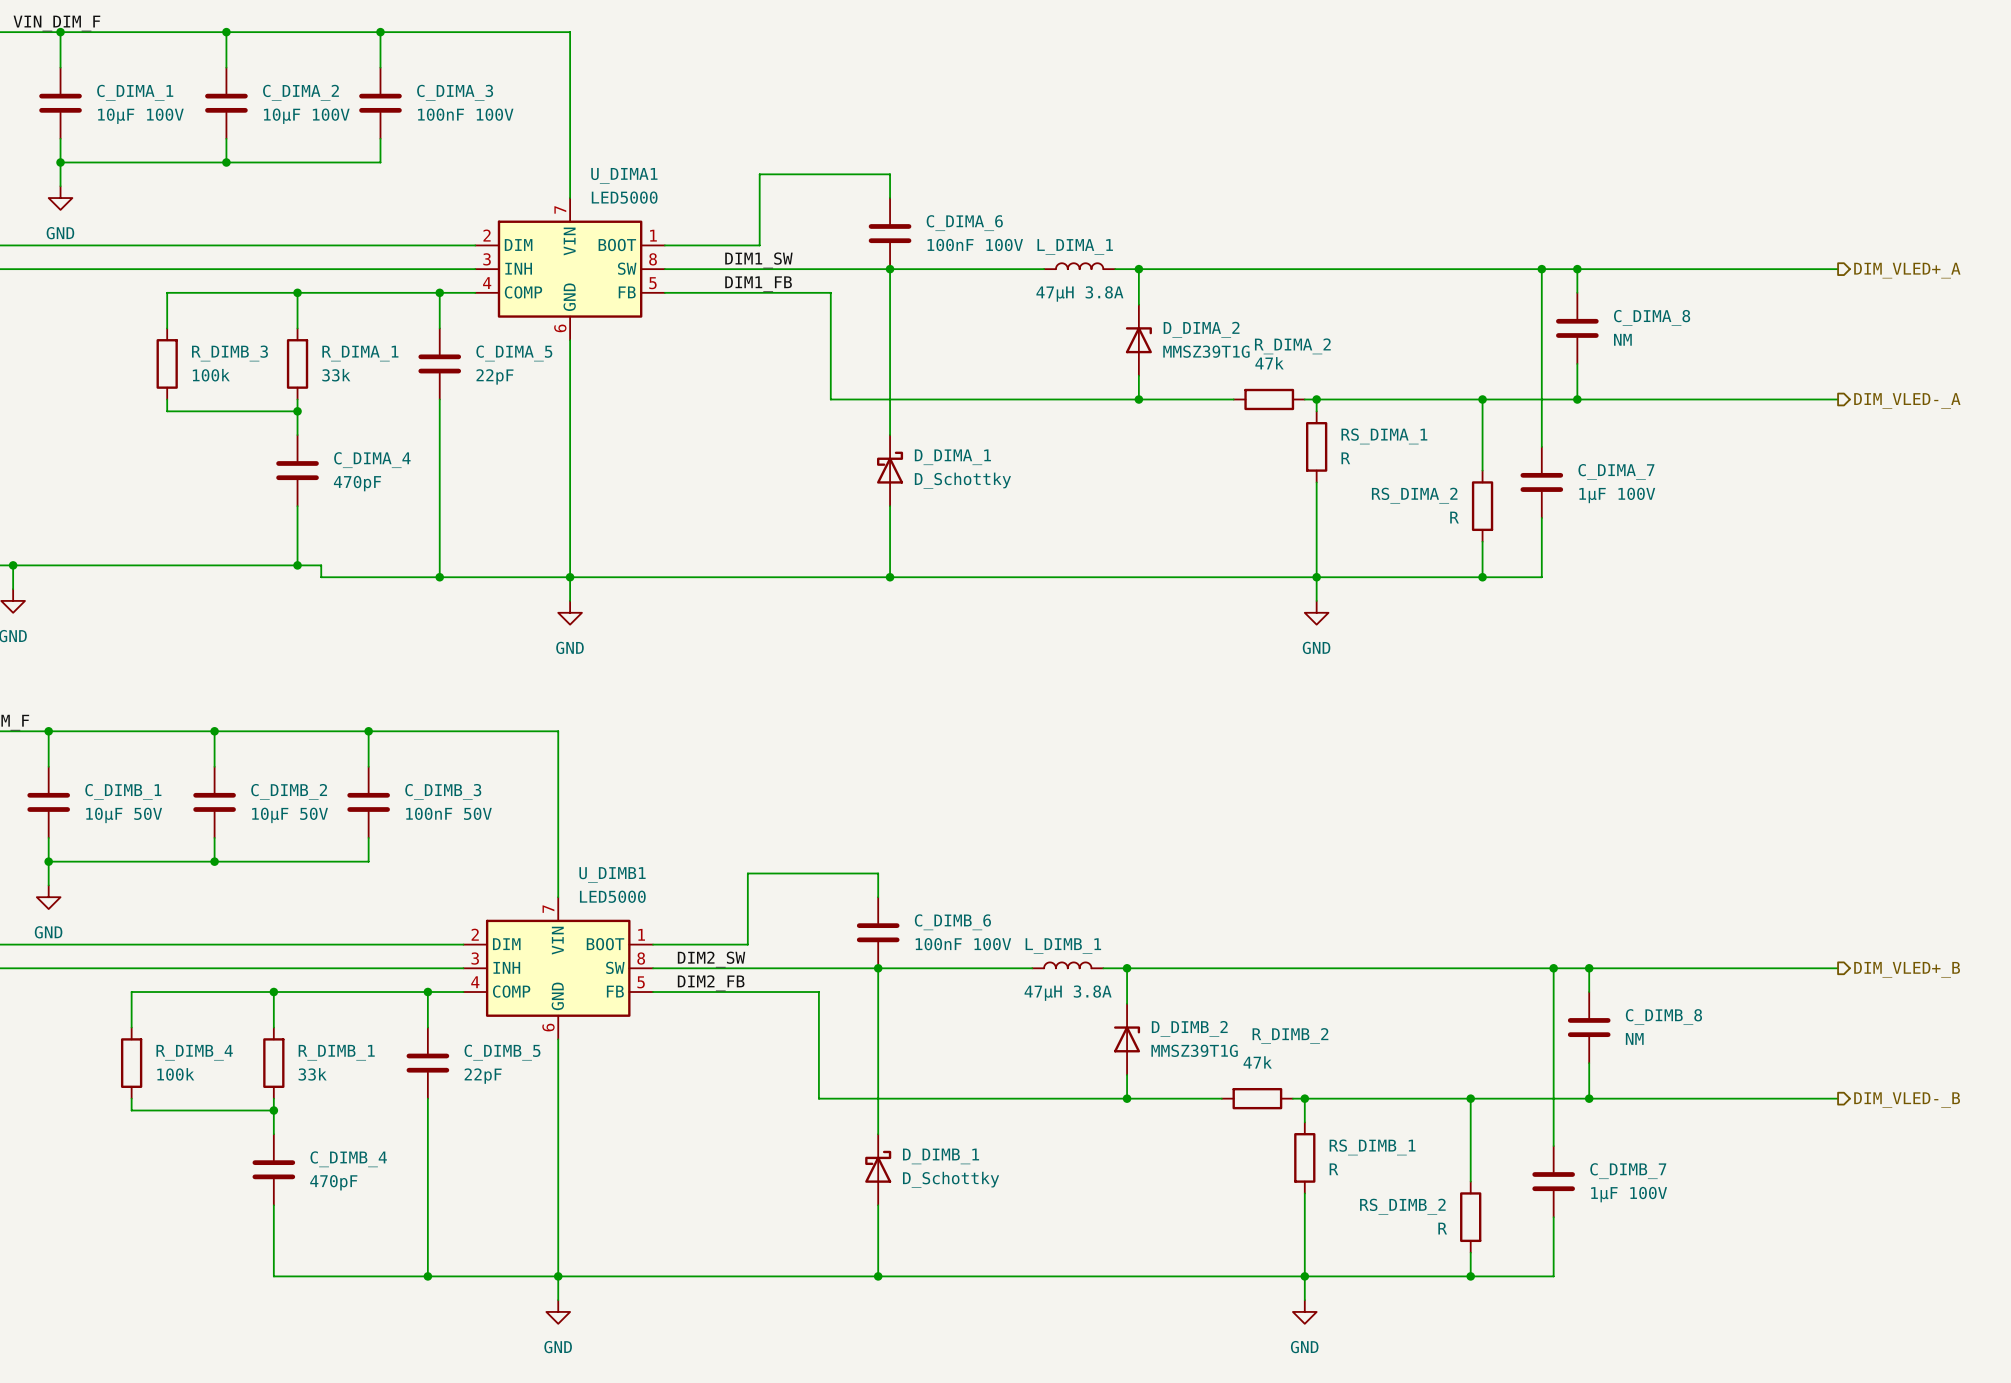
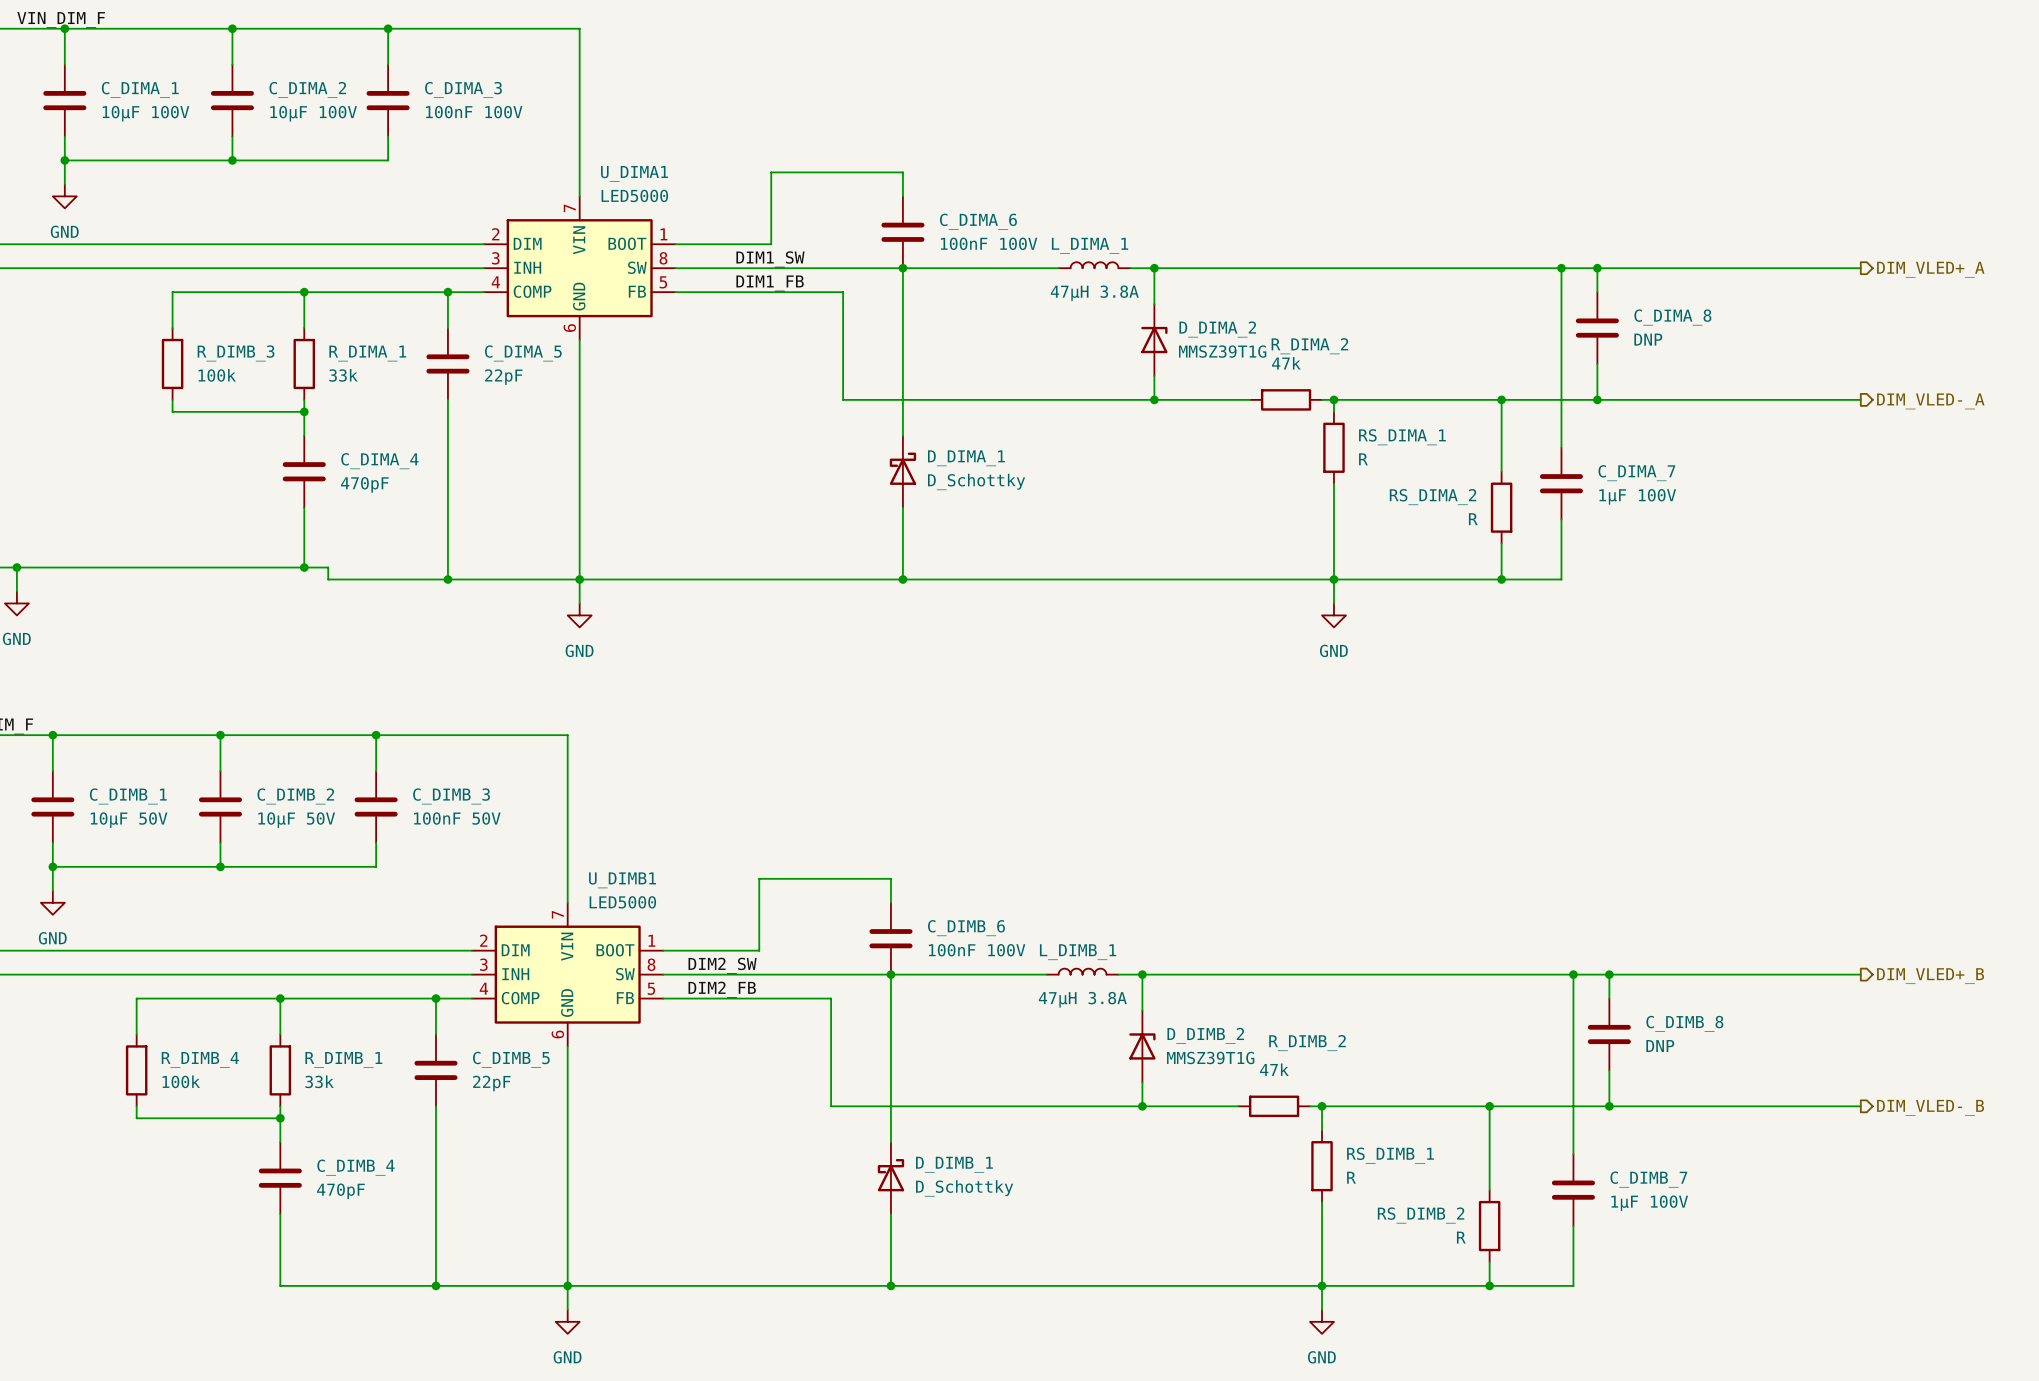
C_DIMA_8 value: NM (1622, 339) -> DNP (1648, 339)
C_DIMB_8 value: NM (1634, 1038) -> DNP (1660, 1046)

